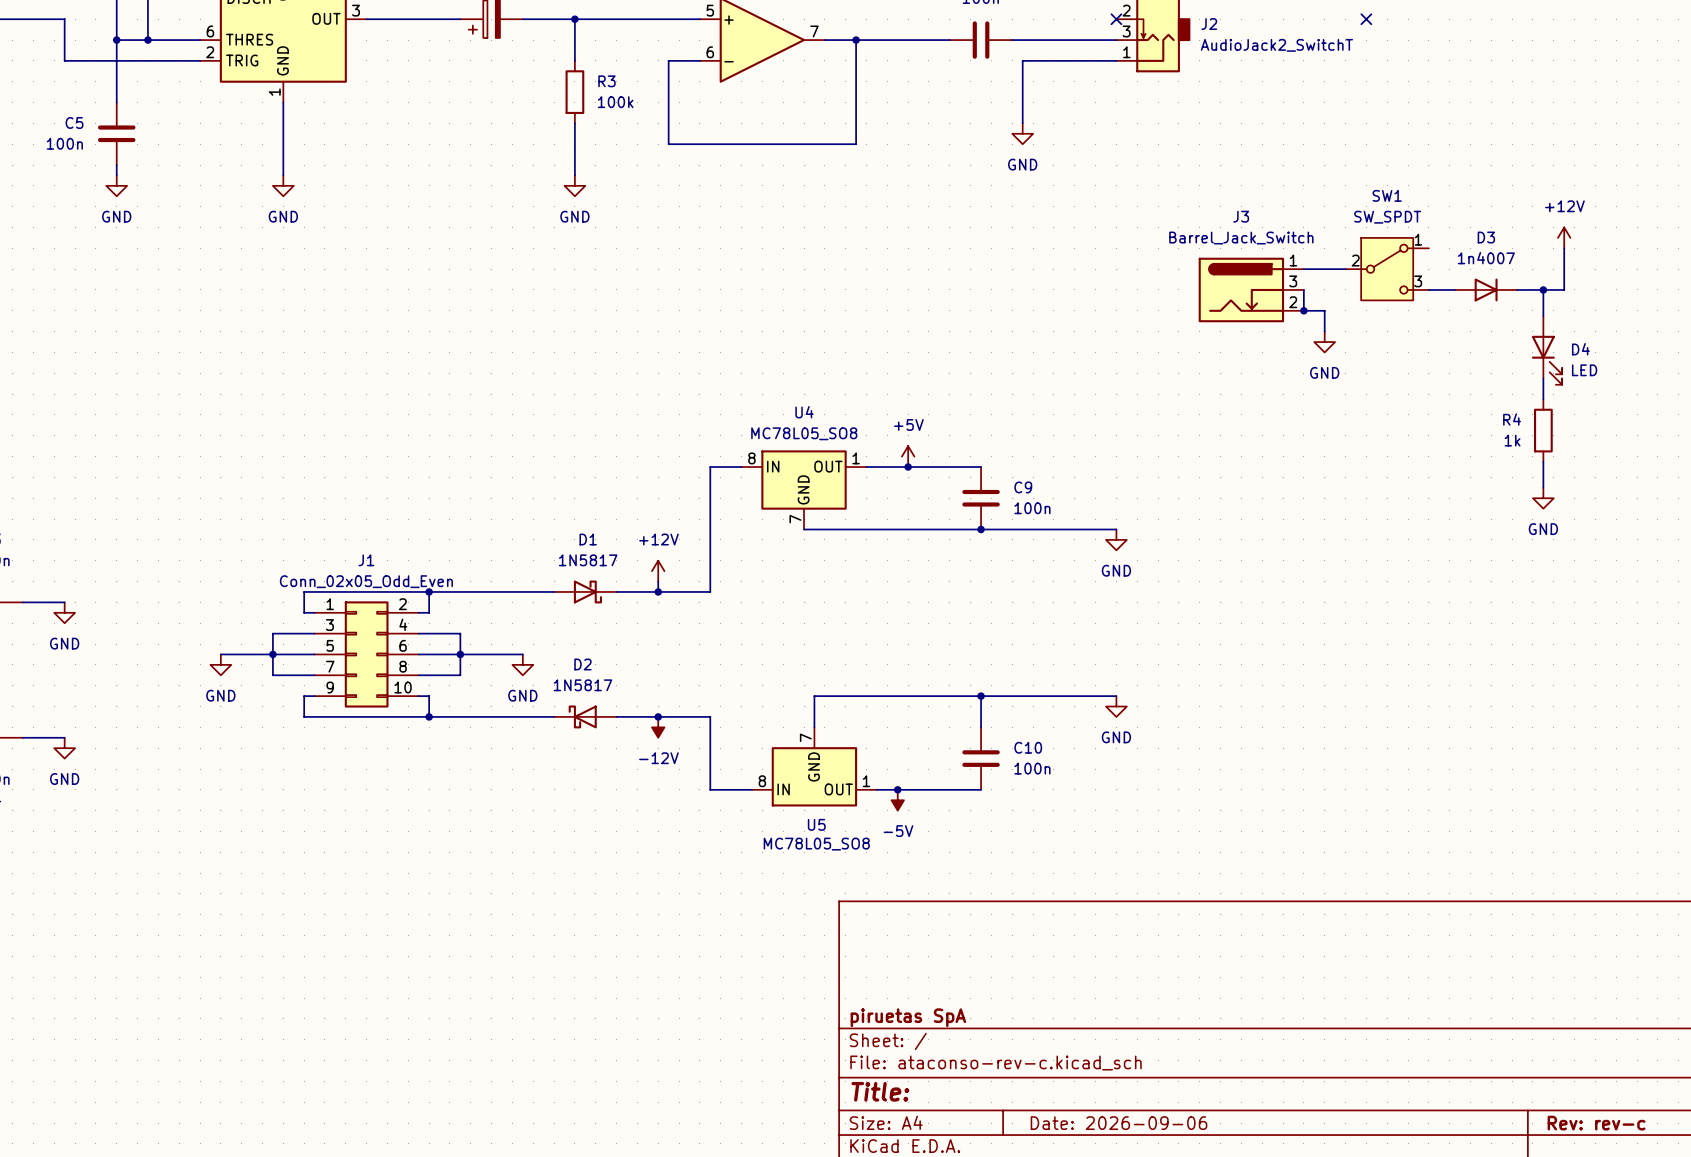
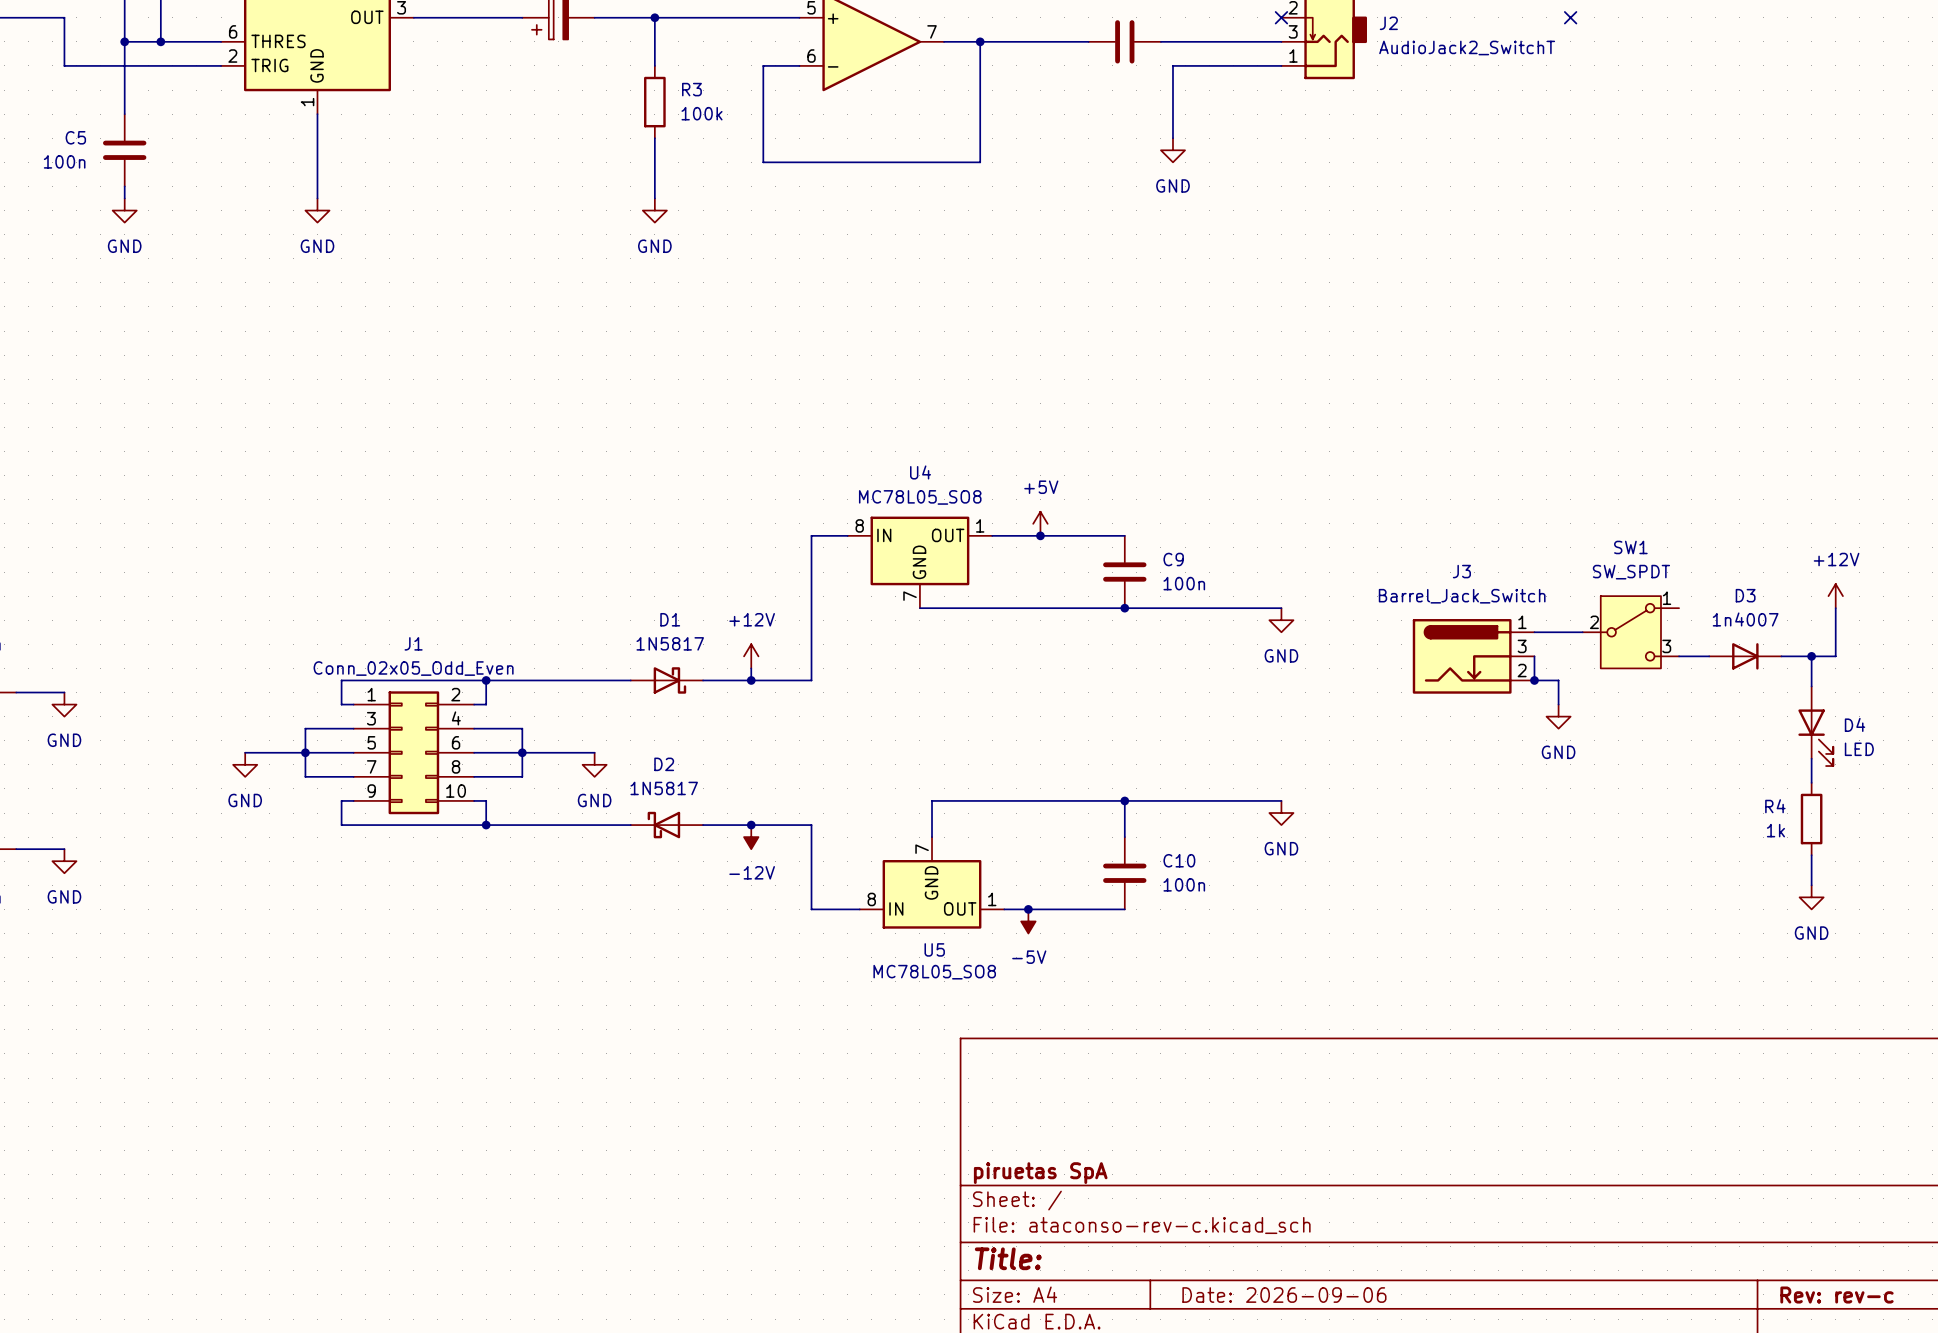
power symbol: +12V (1564, 237) -> none
wire: (1564, 248) (1564, 289) (1517, 289) -> none
wire: (1303, 269) (1345, 269) -> none
SW1 position: (1387, 269) -> (1630, 632)
J3 position: (1251, 289) -> (1473, 656)
wire: (1303, 289) (1303, 310) (1324, 310) (1324, 331) -> none
wire: (1428, 289) (1454, 289) -> none
D3 position: (1486, 289) -> (1745, 656)
wire: (1543, 289) (1543, 316) -> none
junction: (1543, 289) -> none
junction: (1303, 310) -> none
power symbol: GND (1324, 342) -> none
D4 position: (1547, 350) -> (1815, 726)
wire: (1543, 378) (1543, 399) -> none
R4 position: (1543, 430) -> (1811, 819)
wire: (1543, 461) (1543, 487) -> (1811, 656) (1811, 686)
power symbol: GND (1543, 498) -> none
power symbol: none -> +12V (1835, 596)
wire: none -> (1835, 608) (1835, 656) (1781, 656)
wire: none -> (1534, 632) (1582, 632)
wire: none -> (1534, 656) (1534, 680) (1558, 680) (1558, 704)
wire: none -> (1679, 656) (1709, 656)
junction: none -> (1811, 656)
junction: none -> (1534, 680)
power symbol: none -> GND (1558, 716)
wire: none -> (1811, 758) (1811, 782)
wire: none -> (1811, 855) (1811, 885)
power symbol: none -> GND (1811, 897)

